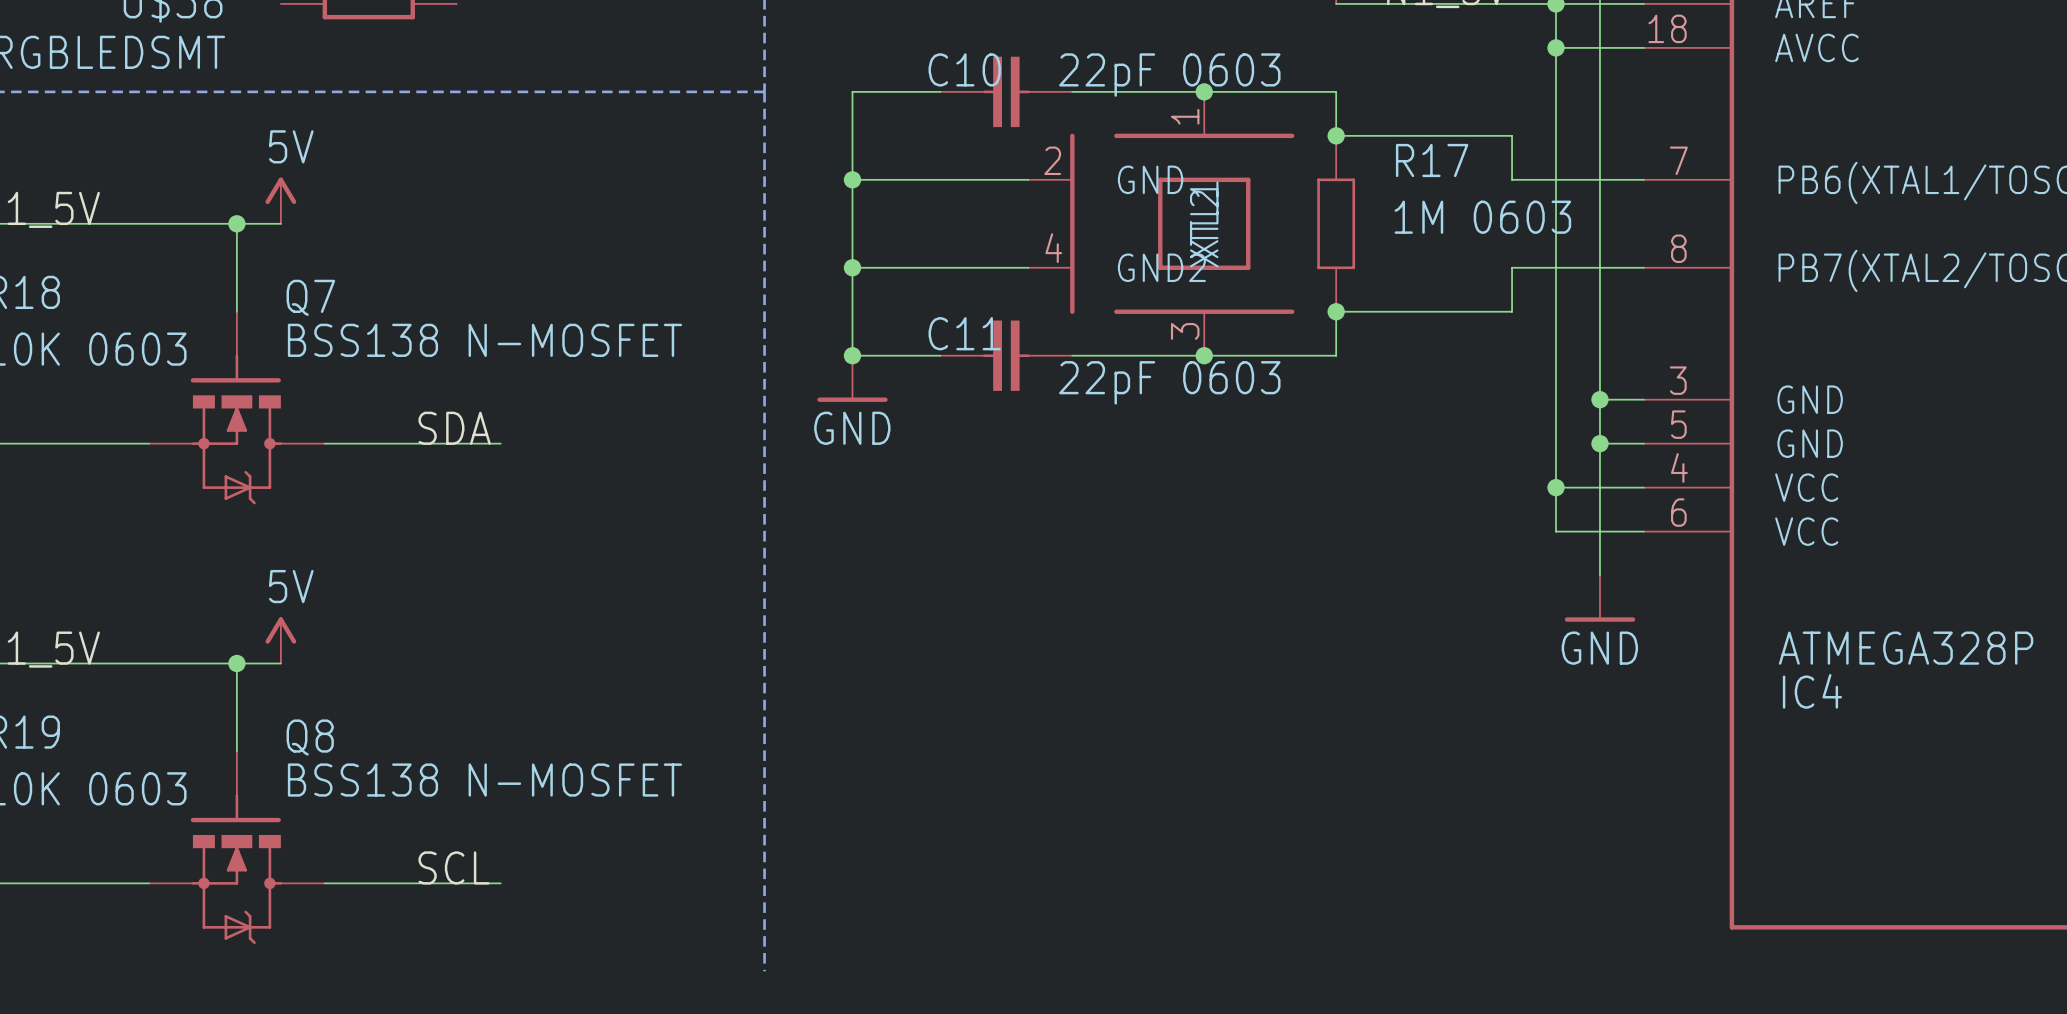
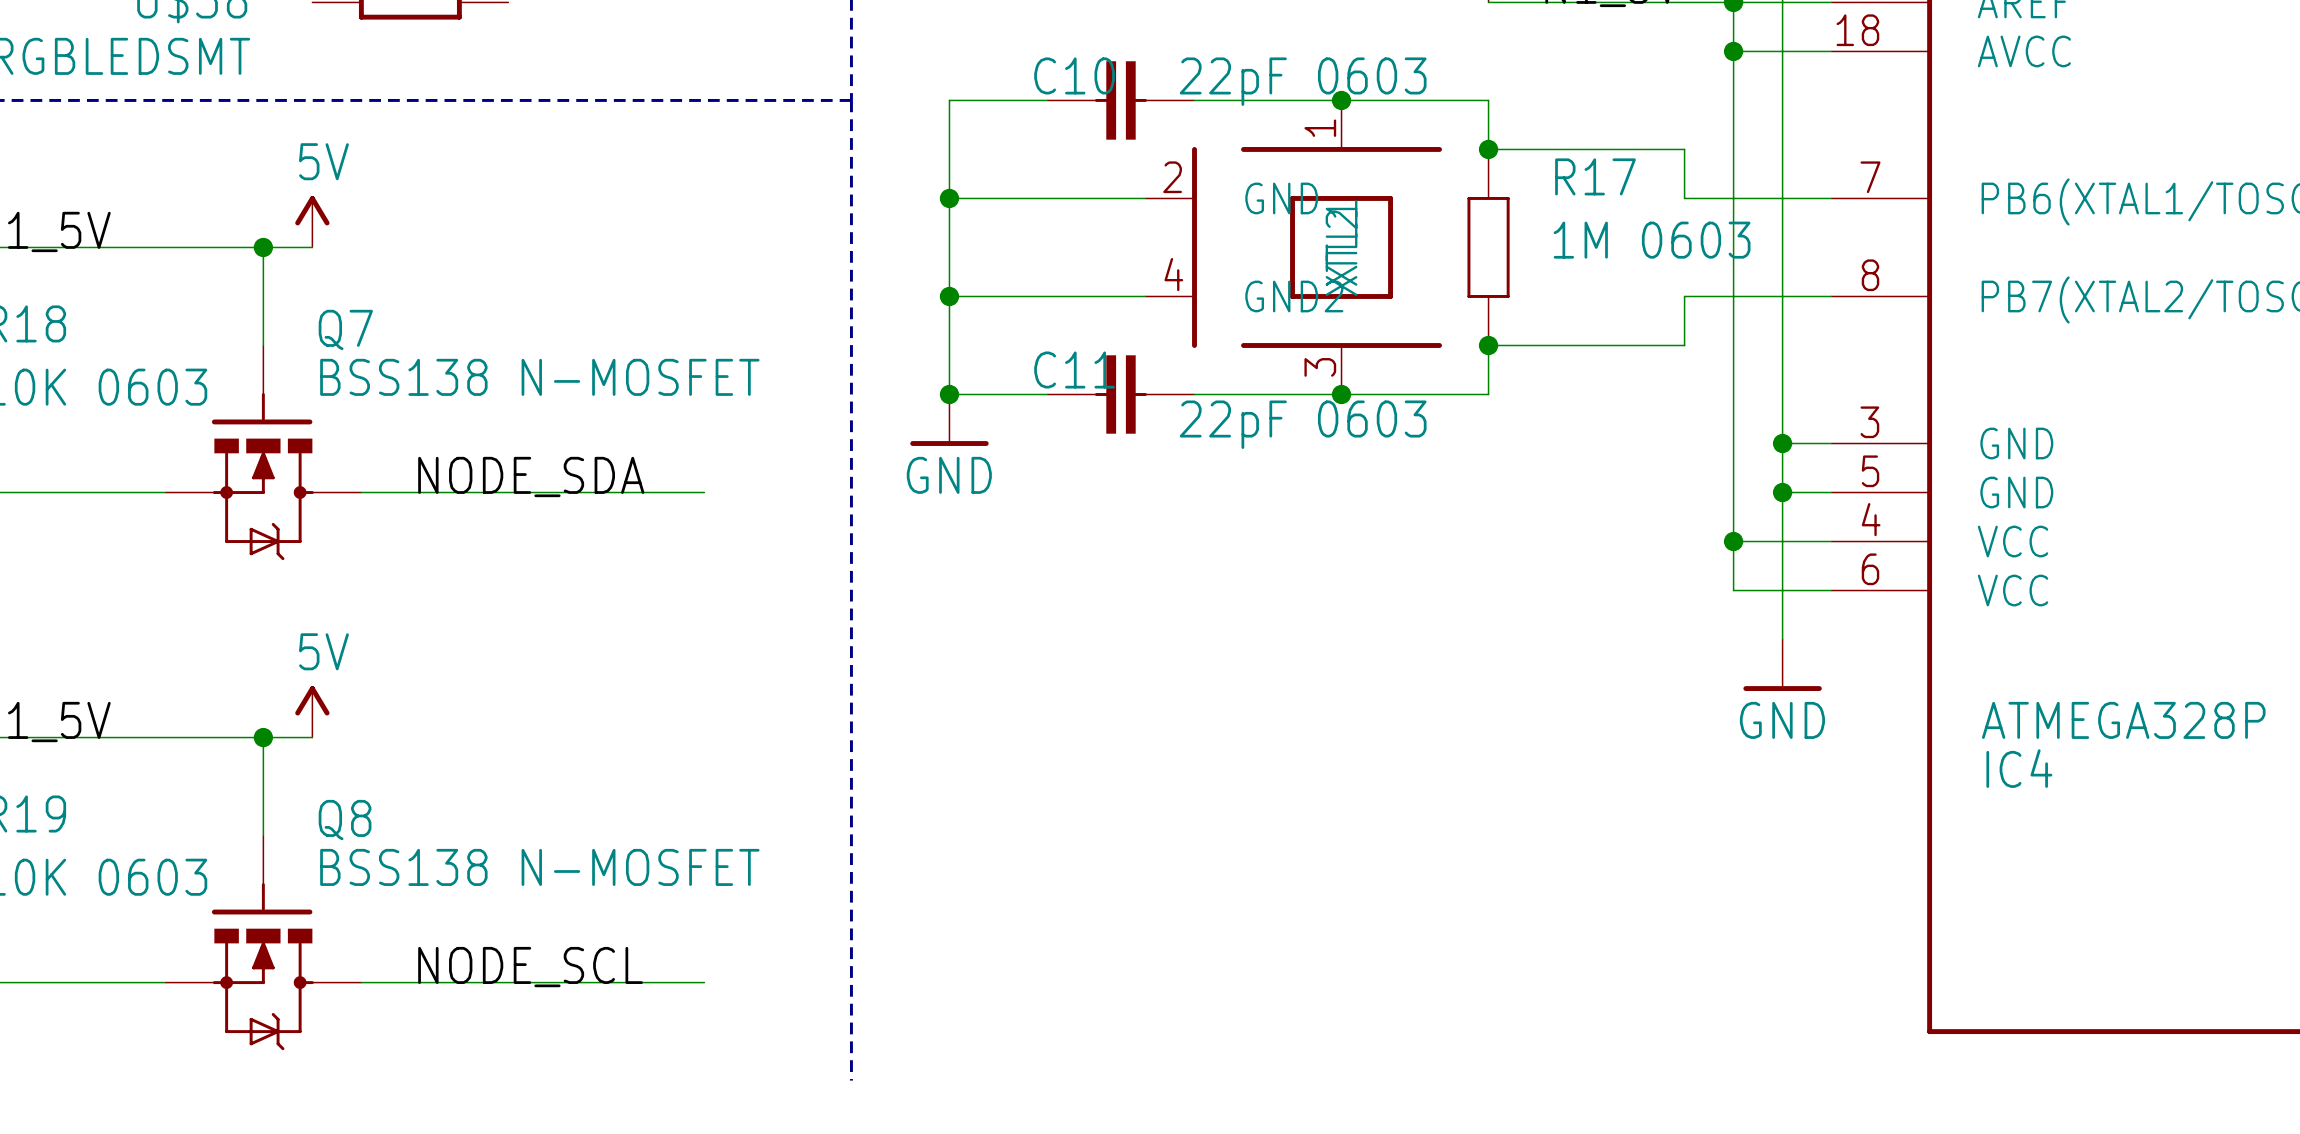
label: SDA (454, 428) -> none
label: none -> NODE_SDA (531, 477)
wire: none -> (557, 492) (704, 492)
label: SCL (453, 867) -> none
label: none -> NODE_SCL (530, 967)
wire: none -> (557, 982) (704, 982)

